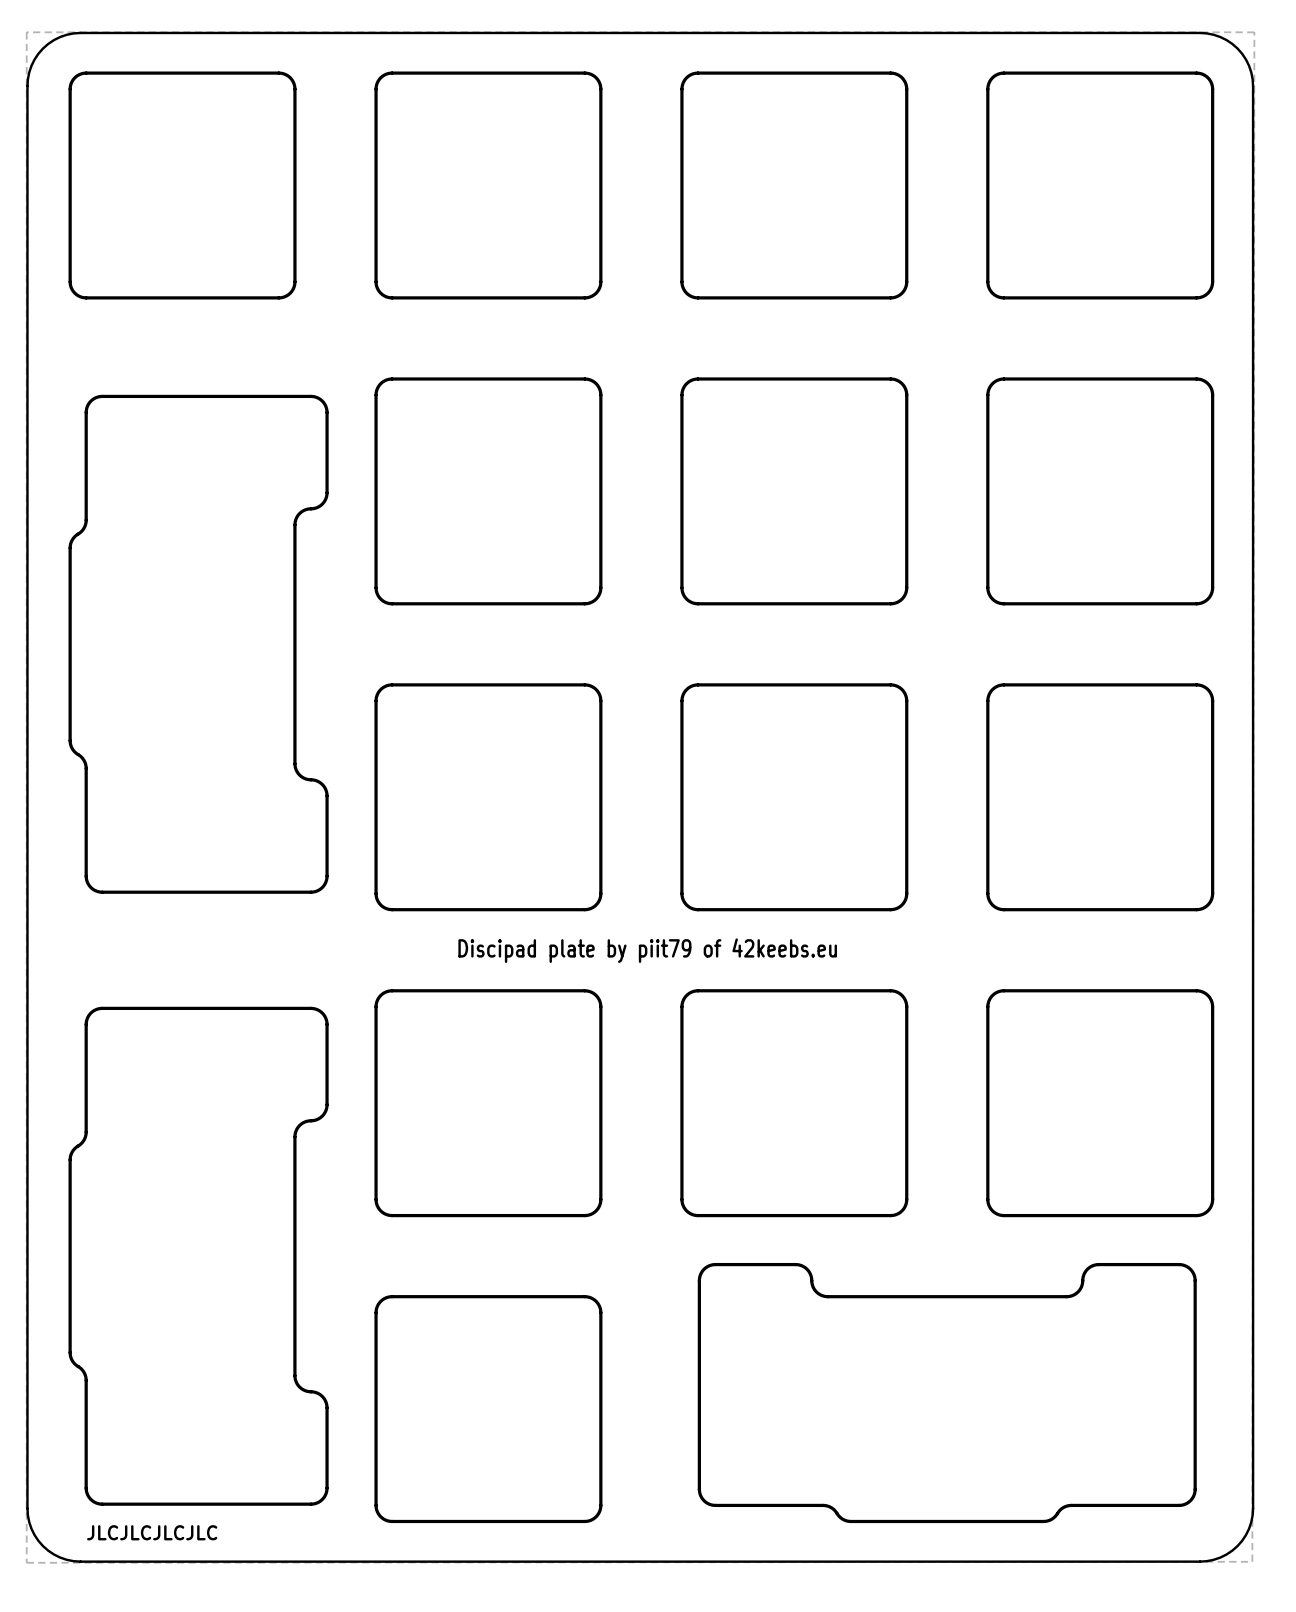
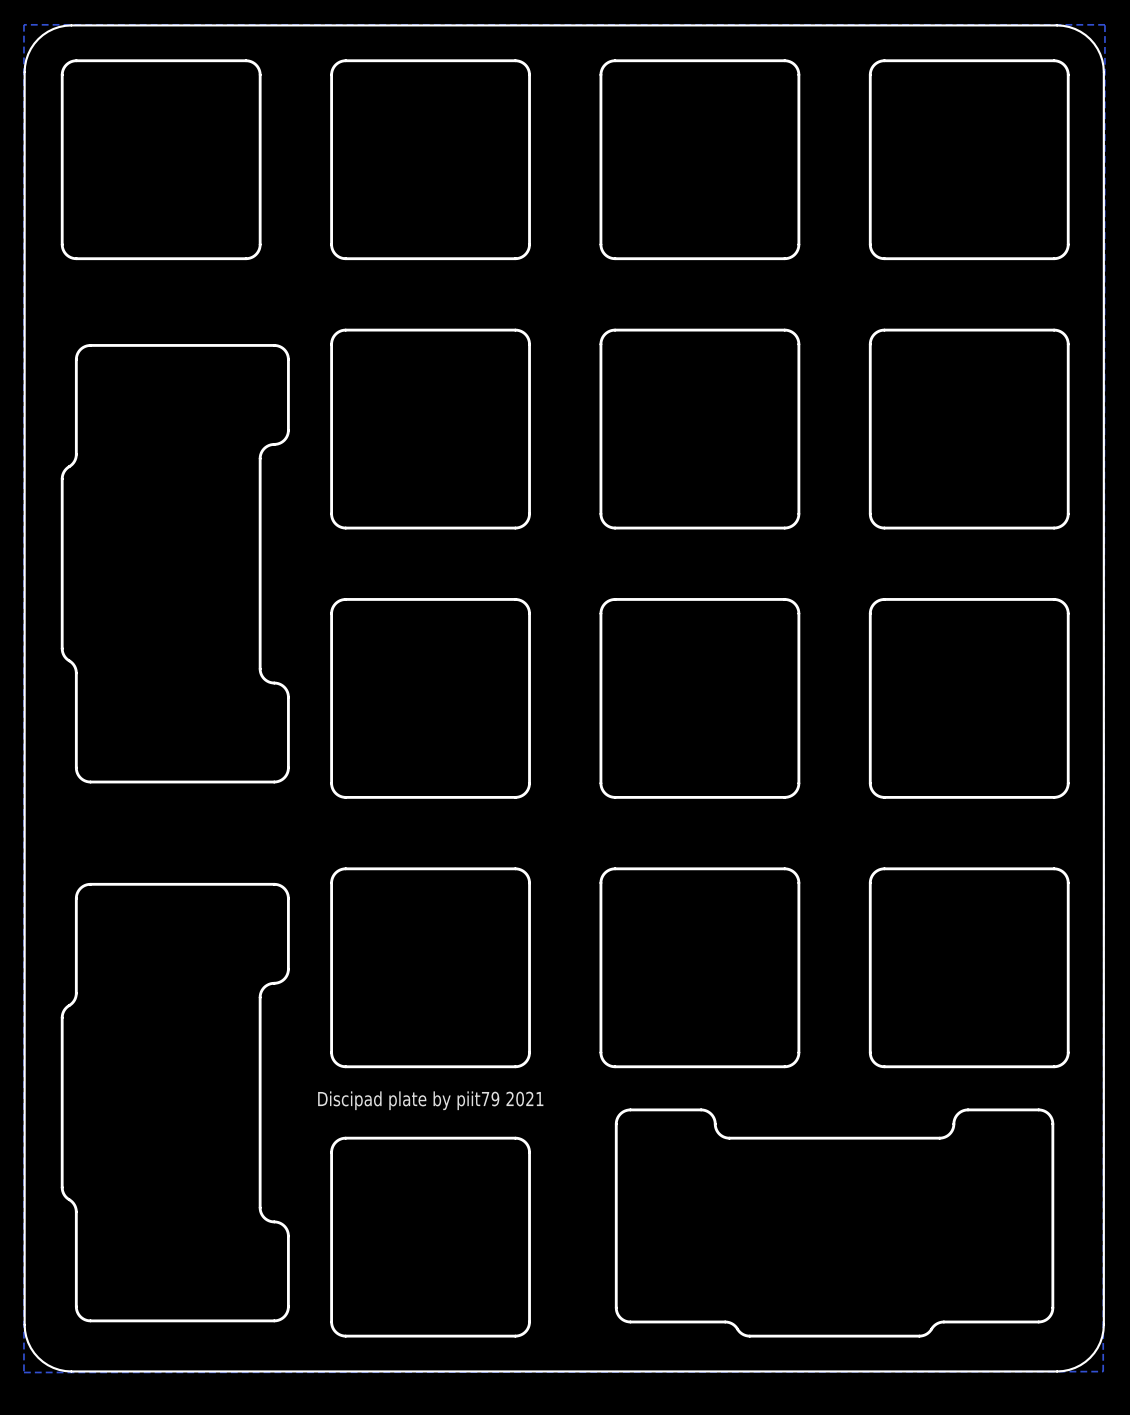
text: Discipad plate by piit79 of 42keebs.eu (647, 950) -> none
text: none -> Discipad plate by piit79 2021 (430, 1100)
text: JLCJLCJLCJLC (152, 1532) -> none

